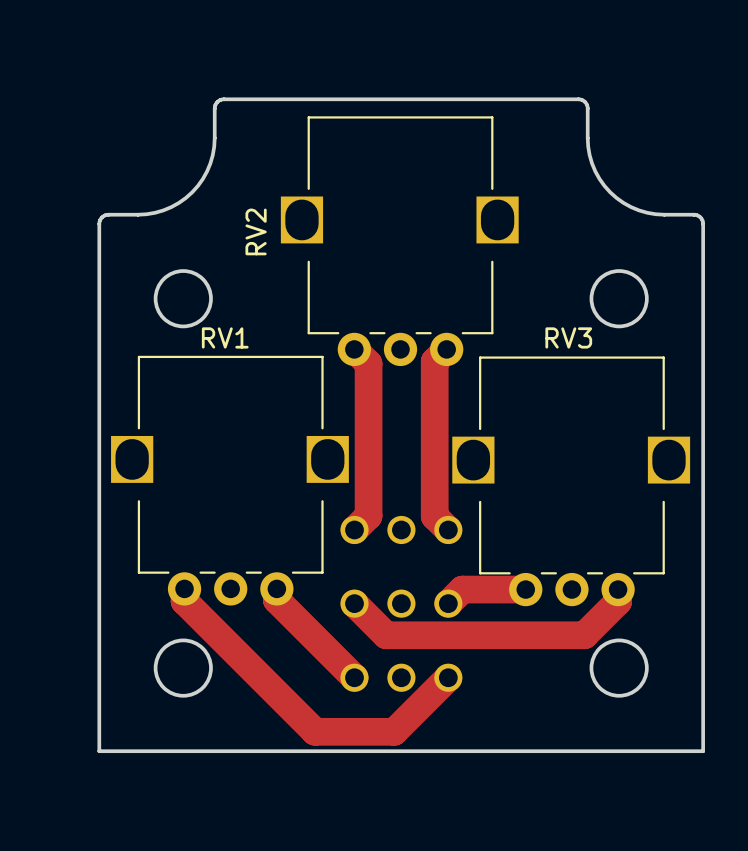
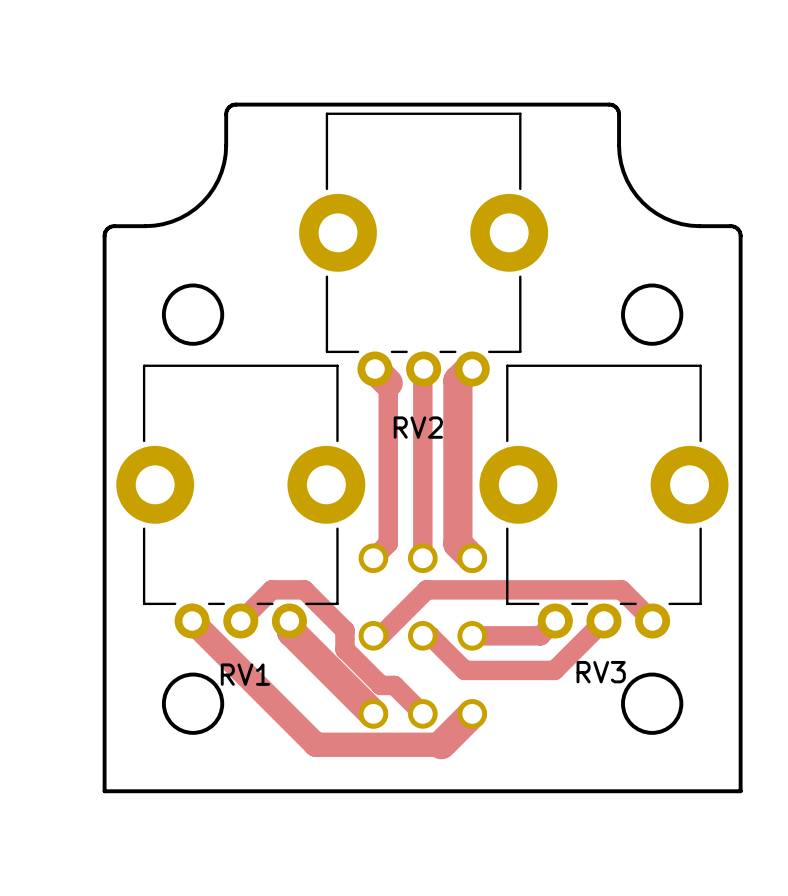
RV2 footprint: [280, 116, 519, 367] -> [299, 112, 549, 387]
RV2 name position: RV2 (256, 231) -> RV2 (418, 427)
RV1 name position: RV1 (225, 337) -> RV1 (245, 674)
RV3 name position: RV3 (568, 337) -> RV3 (601, 672)
track: none -> (423, 369) (422, 558)
RV1 footprint: [111, 355, 349, 606] -> [116, 364, 366, 639]
RV3 footprint: [452, 356, 691, 607] -> [479, 364, 729, 639]
track width: thick (368, 363) (368, 515) (354, 529) -> thin (388, 383) (388, 543) (373, 558)
track: (184, 588) (184, 601) (315, 731) (394, 731) (419, 707) -> (192, 621) (315, 744) (441, 744)
track: none -> (240, 621) (271, 589) (304, 589) (344, 630) (344, 649) (380, 685) (394, 685) (422, 713)
track: (525, 589) (462, 589) (448, 603) -> (555, 621) (540, 635) (472, 635)
track: none -> (603, 621) (554, 670) (464, 670) (430, 635) (422, 635)
track: (618, 589) (618, 601) (584, 635) (386, 635) (354, 603) -> (652, 621) (621, 589) (426, 589) (380, 635) (373, 635)

